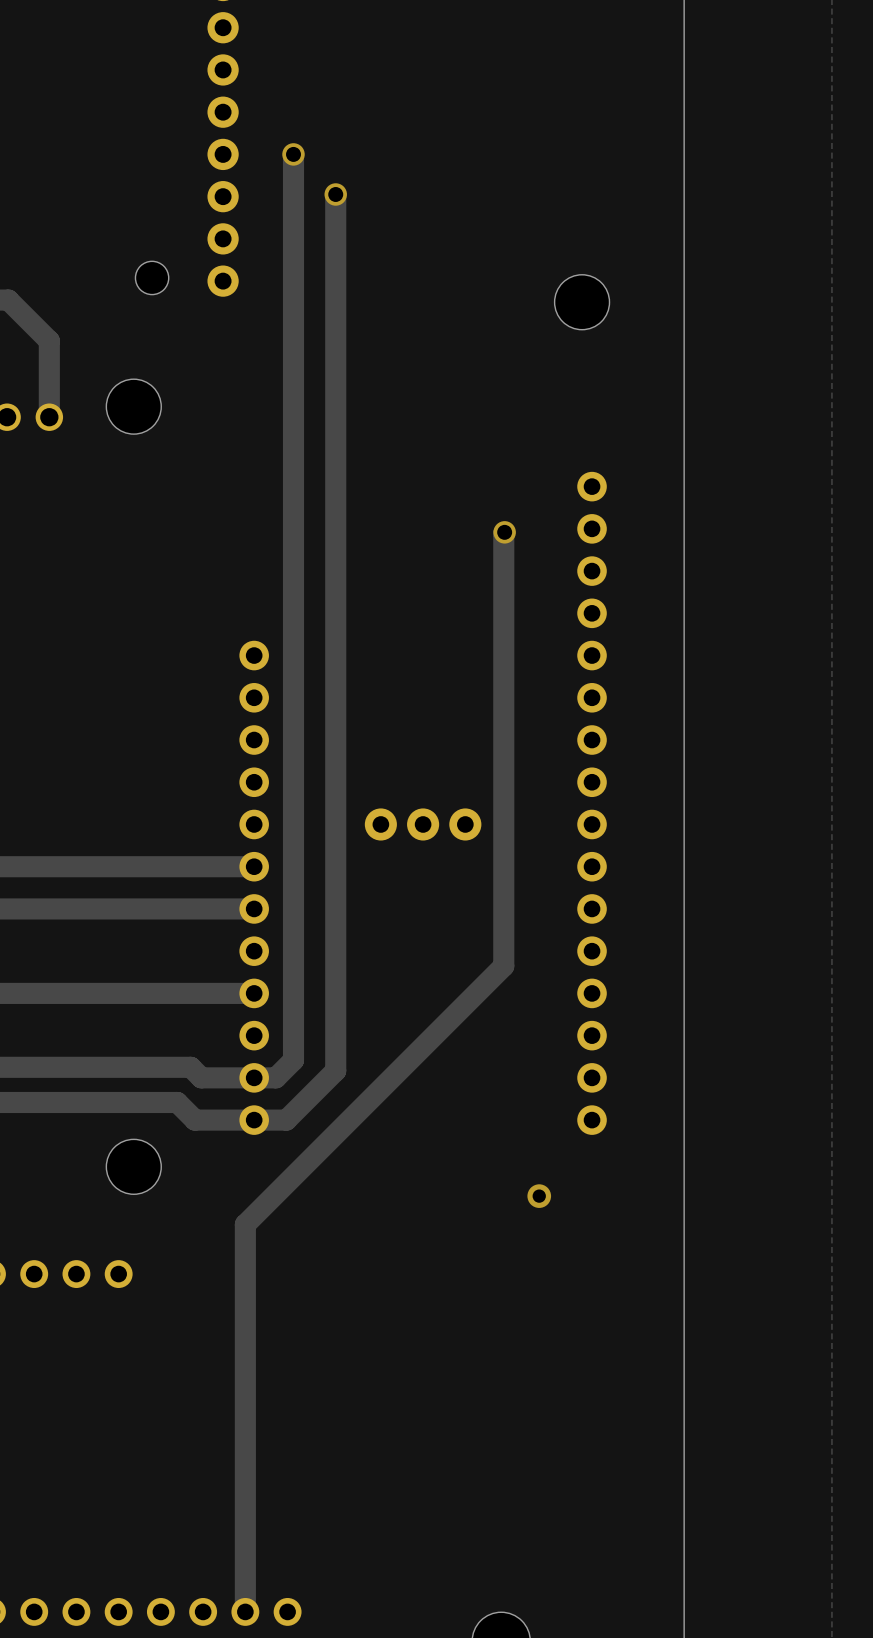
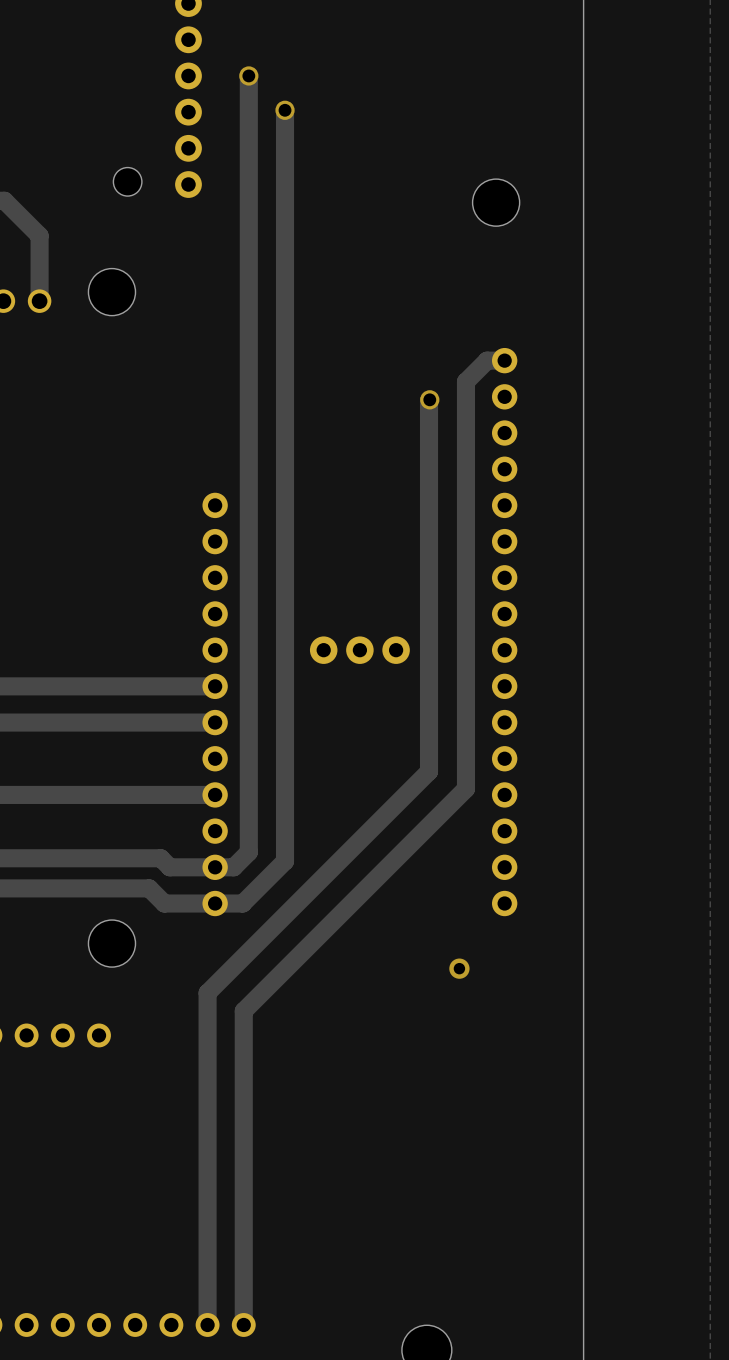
track: none -> (504, 360) (487, 360) (465, 381) (465, 788) (243, 1011) (243, 1324)

